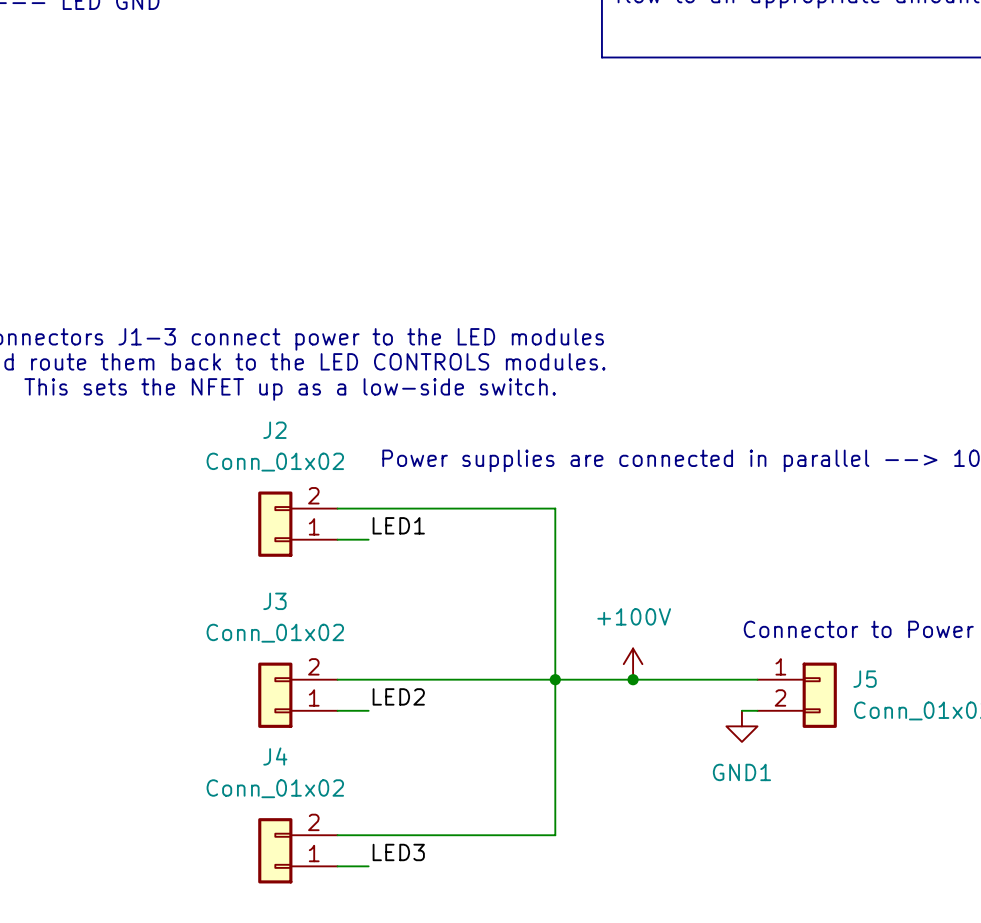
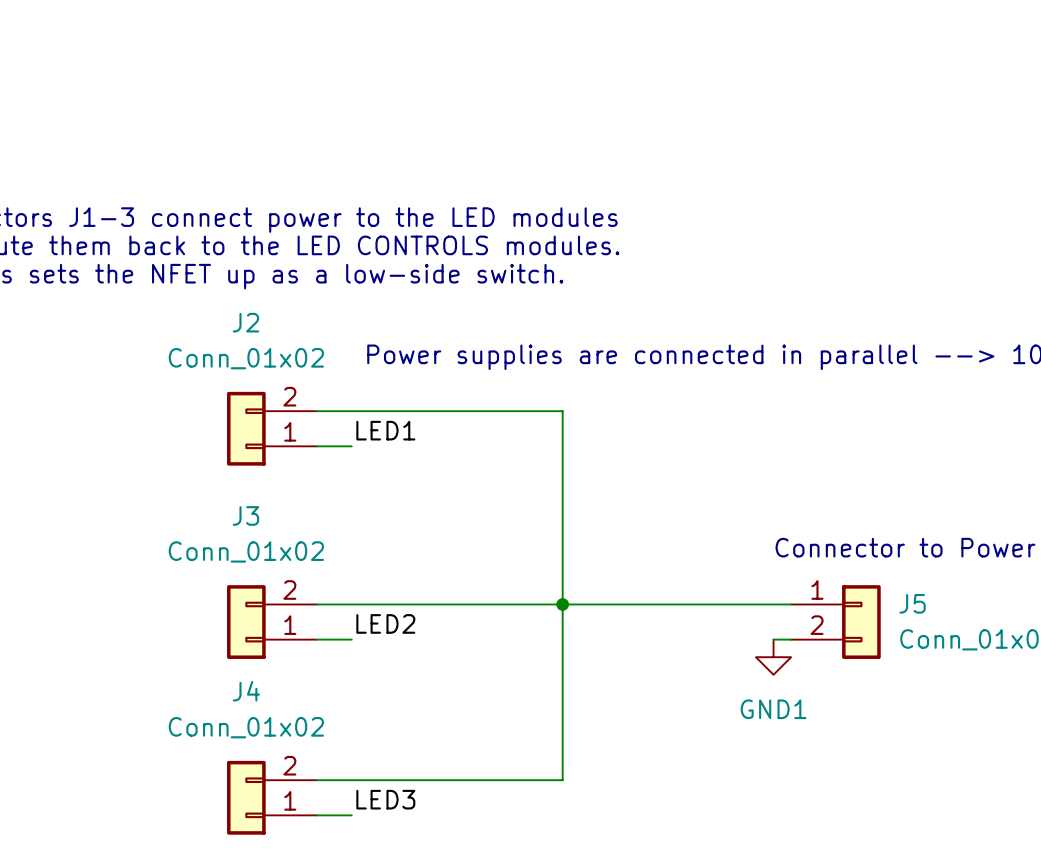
power symbol: +100V (633, 664) -> none
junction: (633, 679) -> none

